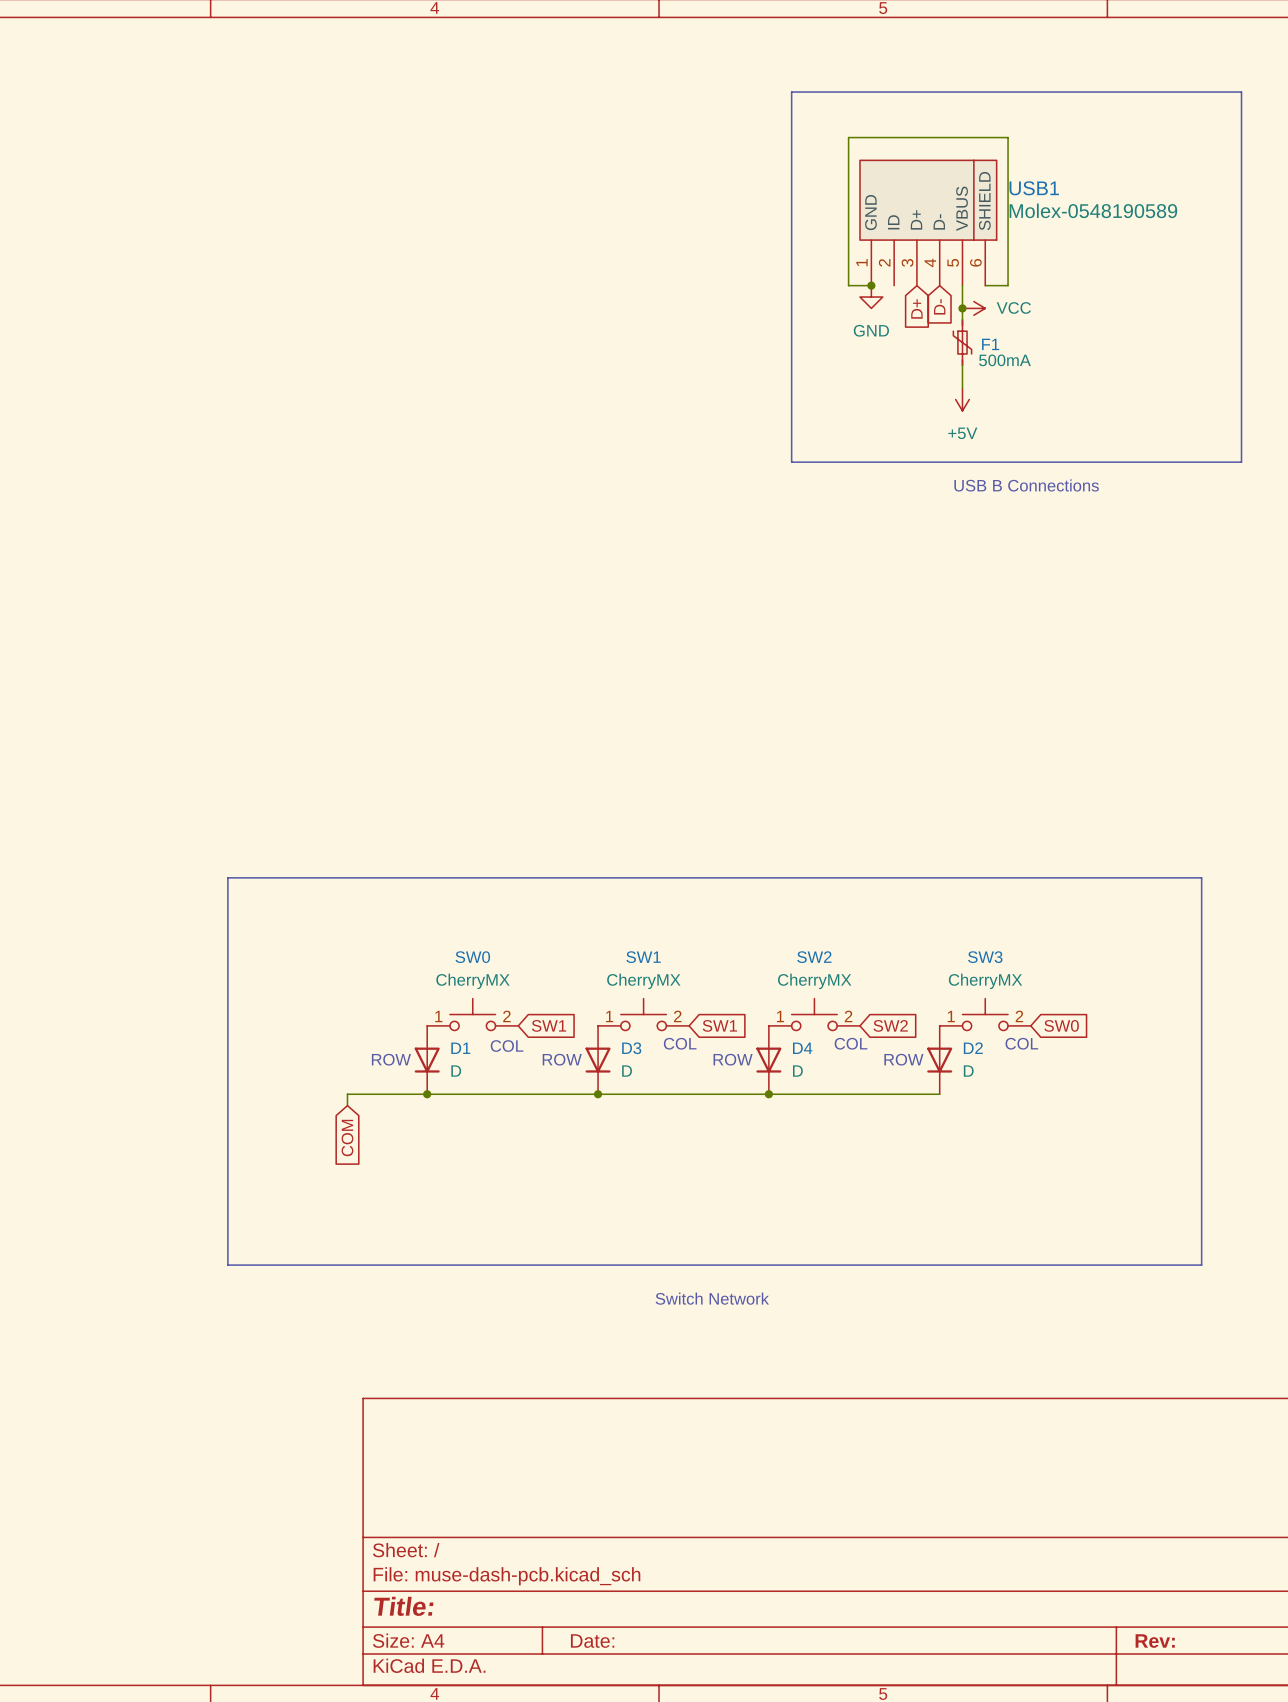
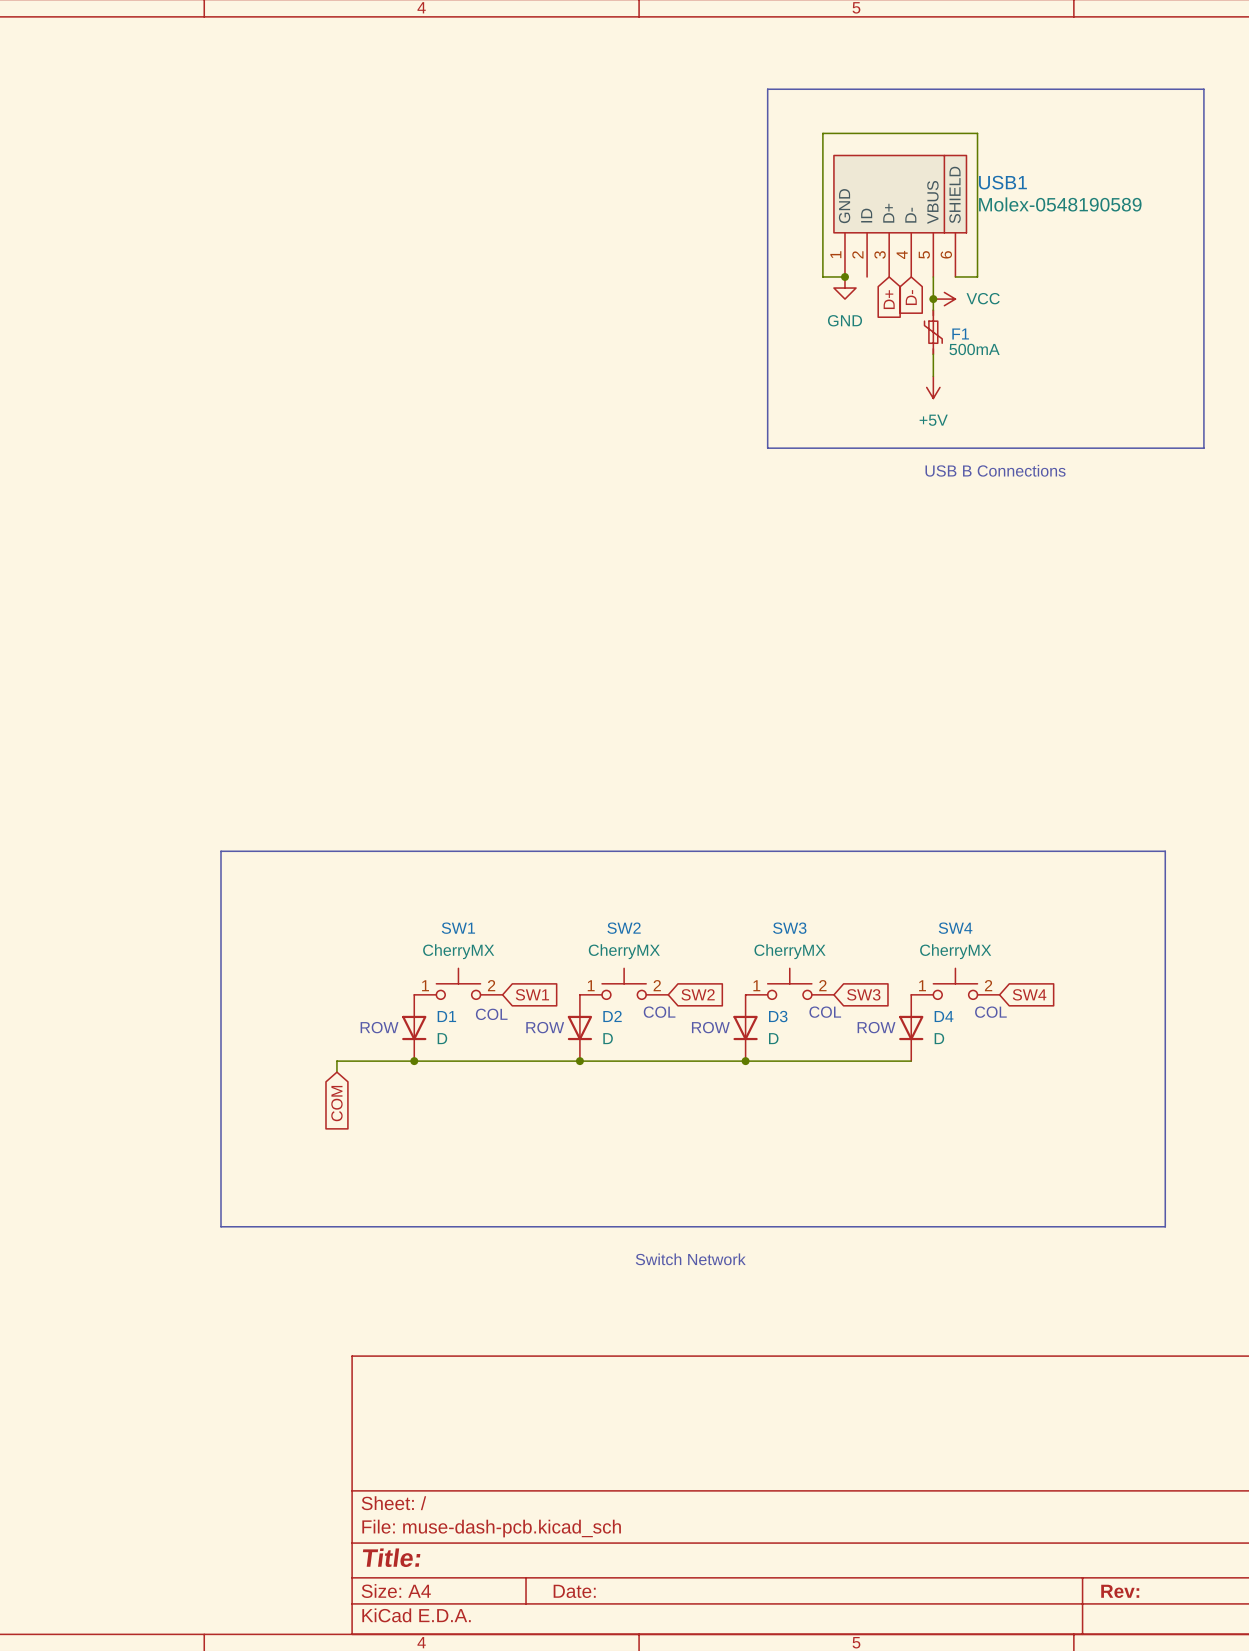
SW0 name: SW0 (472, 957) -> SW1 (458, 928)
SW1 name: SW1 (643, 957) -> SW2 (624, 928)
SW2 name: SW2 (814, 957) -> SW3 (789, 928)
SW3 name: SW3 (985, 957) -> SW4 (955, 928)
global label: SW1 (719, 1025) -> SW2 (698, 994)
global label: SW2 (890, 1025) -> SW3 (863, 994)
global label: SW0 (1061, 1025) -> SW4 (1029, 994)
D3 name: D3 (631, 1048) -> D2 (612, 1016)
D4 name: D4 (802, 1048) -> D3 (778, 1016)
D2 name: D2 (973, 1048) -> D4 (944, 1016)

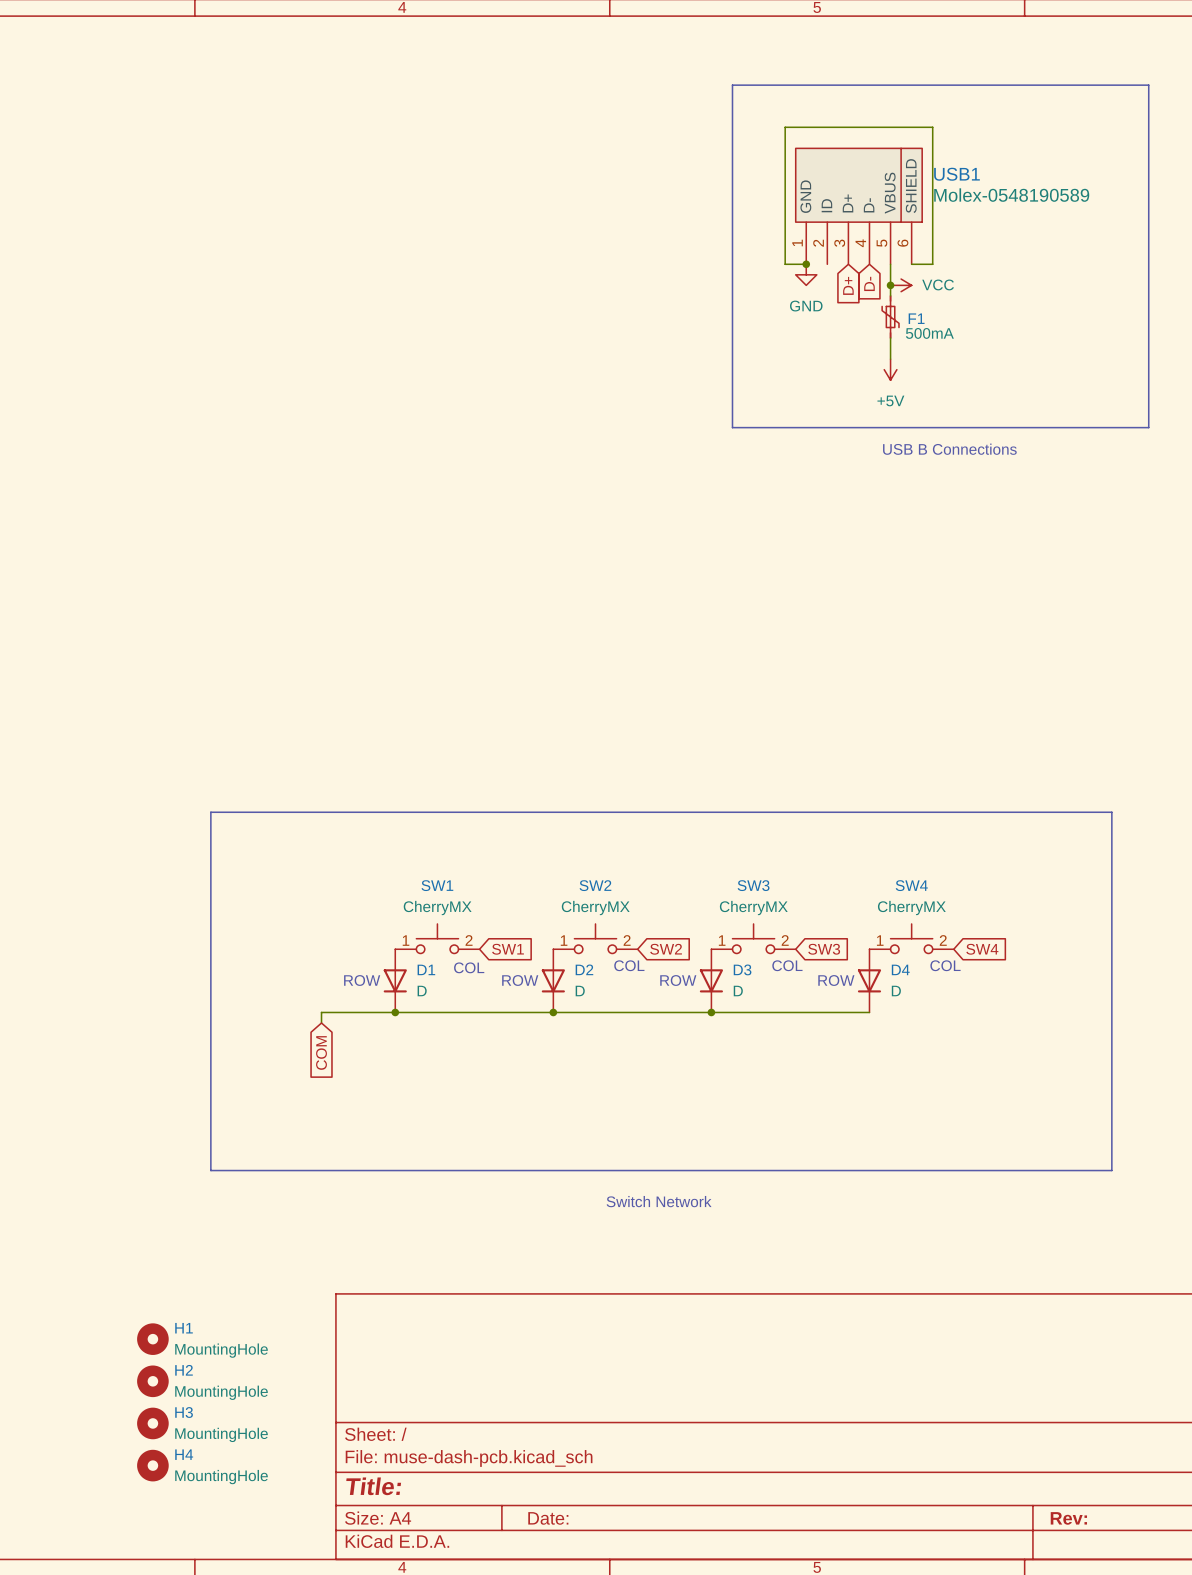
H1: none -> MountingHole (152, 1339)
H2: none -> MountingHole (152, 1381)
H3: none -> MountingHole (152, 1423)
H4: none -> MountingHole (152, 1465)

